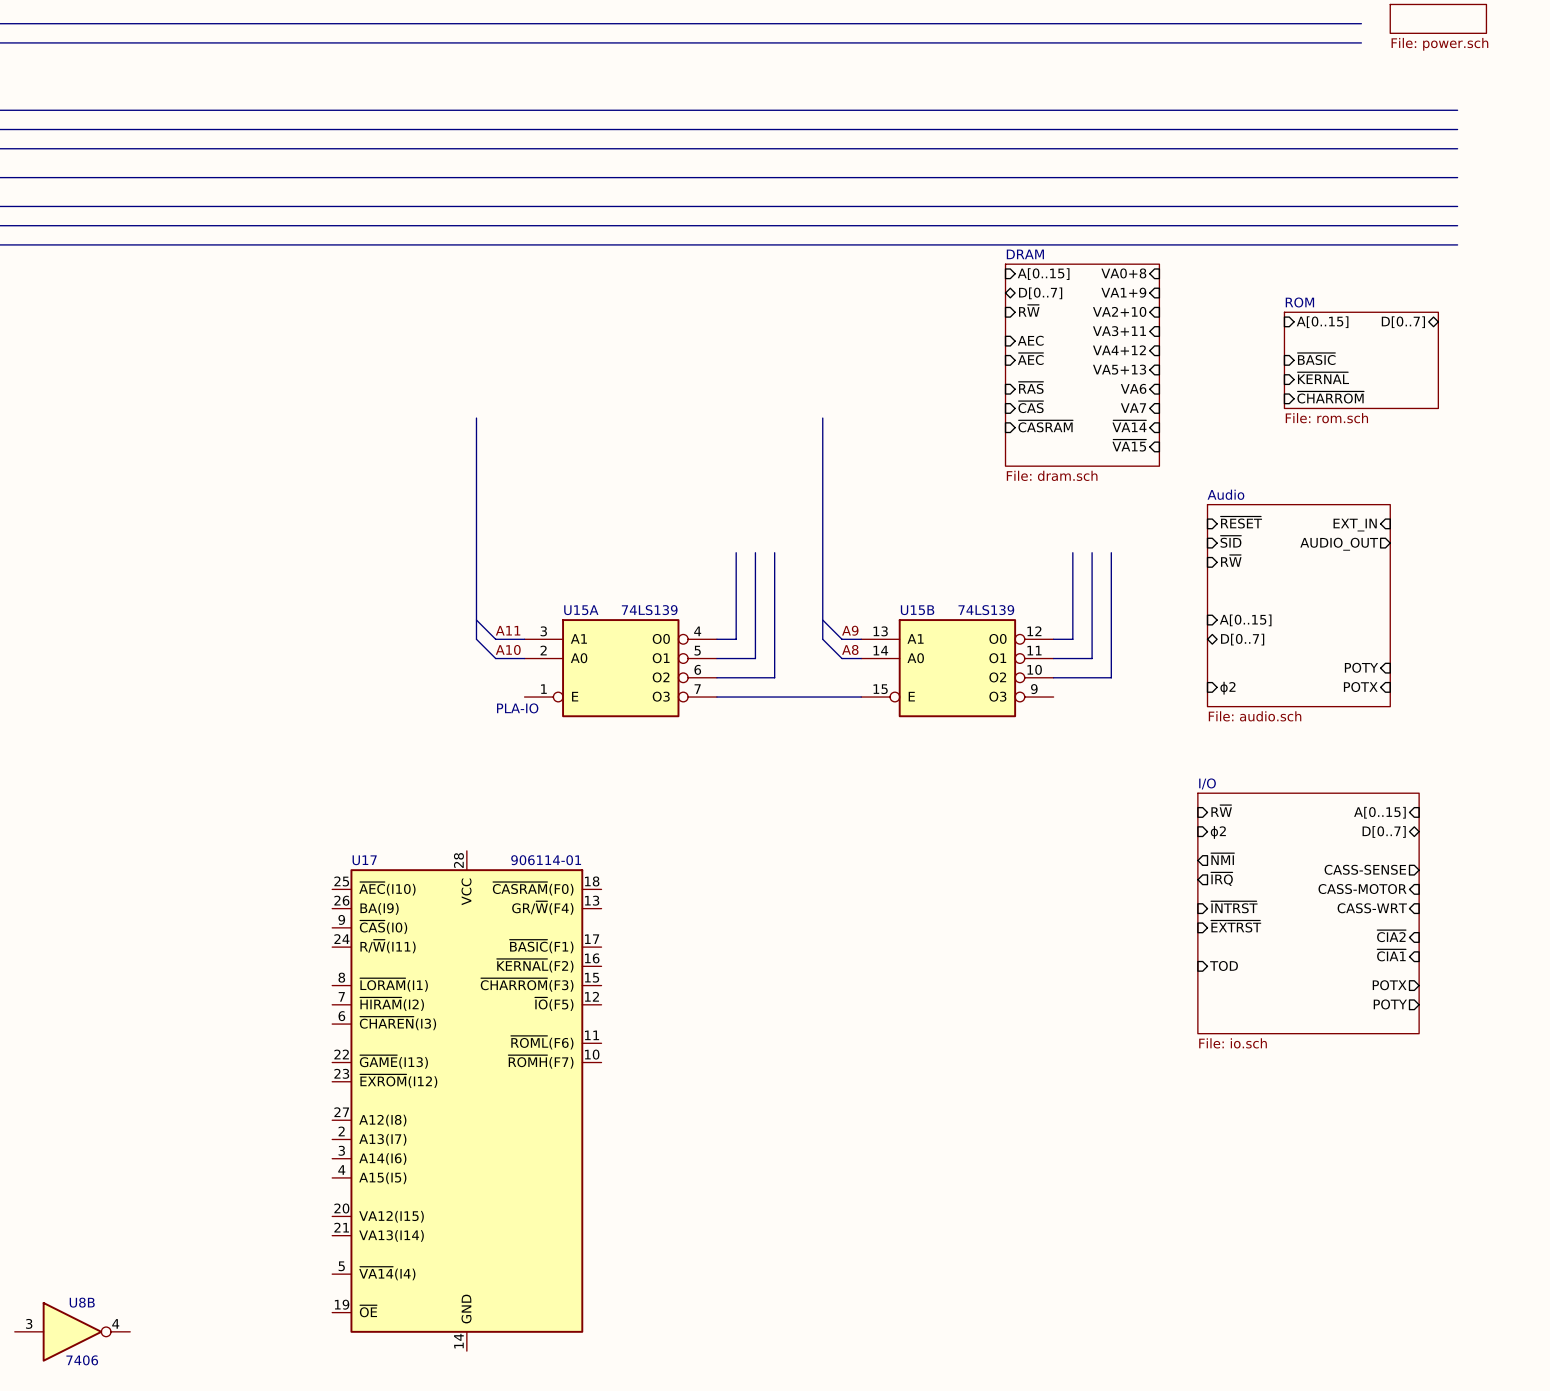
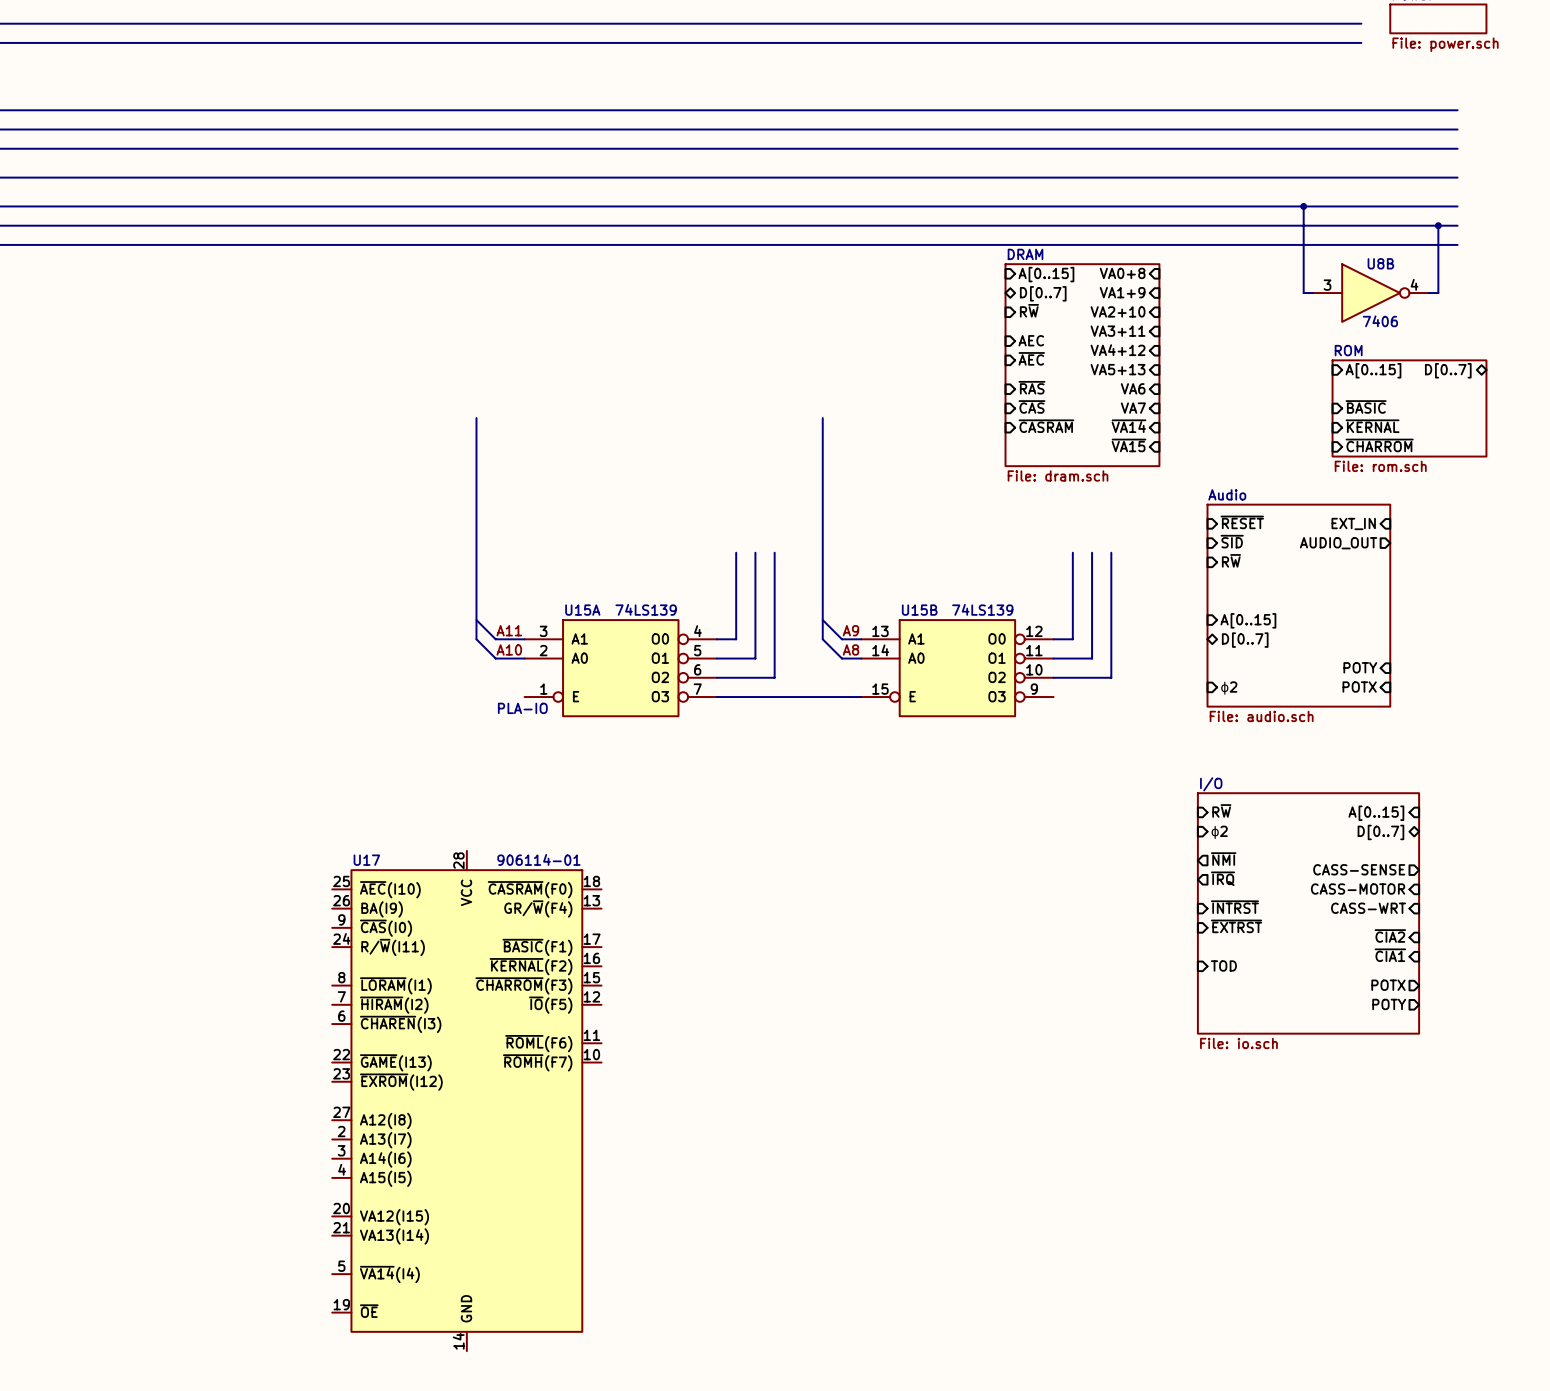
wire: none -> (1303, 206) (1303, 293) (1313, 293)
junction: none -> (1303, 206)
wire: none -> (1438, 225) (1438, 293) (1428, 293)
junction: none -> (1438, 225)
sheet pin position: A[0..15] (1322, 322) -> A[0..15] (1373, 370)
sheet pin position: D[0..7] (1403, 322) -> D[0..7] (1448, 370)
sheet pin position: ~{BASIC} (1316, 358) -> ~{BASIC} (1366, 406)
sheet ROM position: (1361, 360) -> (1409, 408)
sheet pin position: ~{KERNAL} (1323, 378) -> ~{KERNAL} (1372, 426)
sheet pin position: ~{CHARROM} (1330, 397) -> ~{CHARROM} (1379, 445)
U8B position: (72, 1331) -> (1371, 293)

